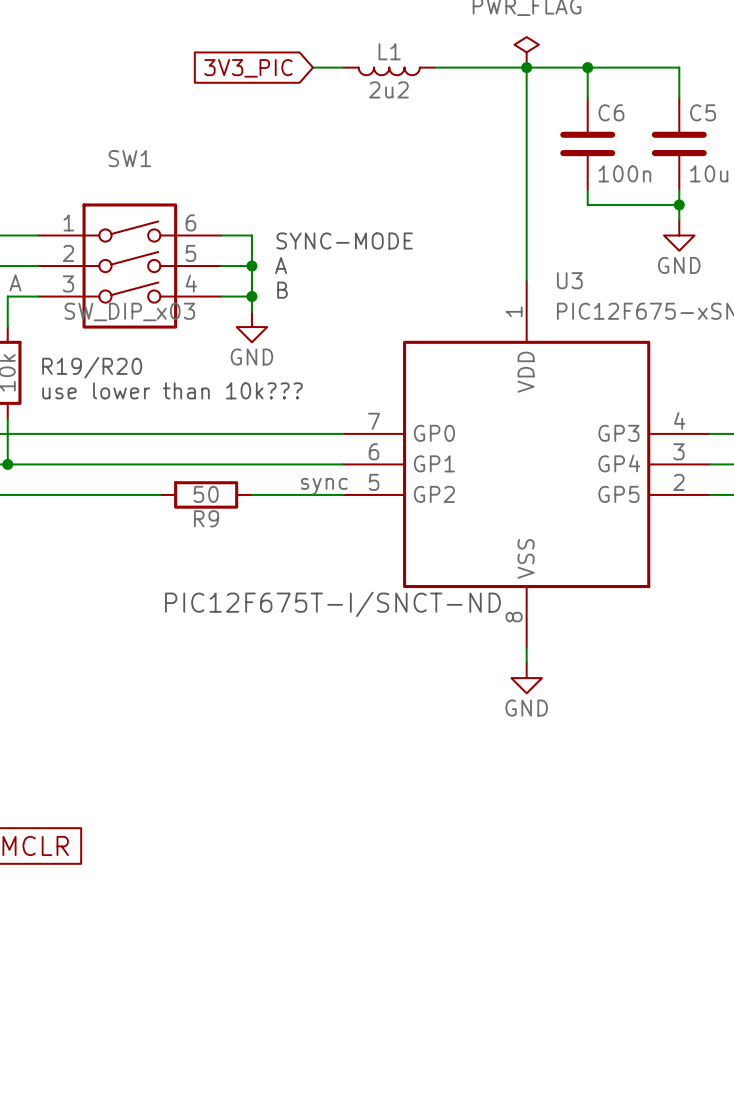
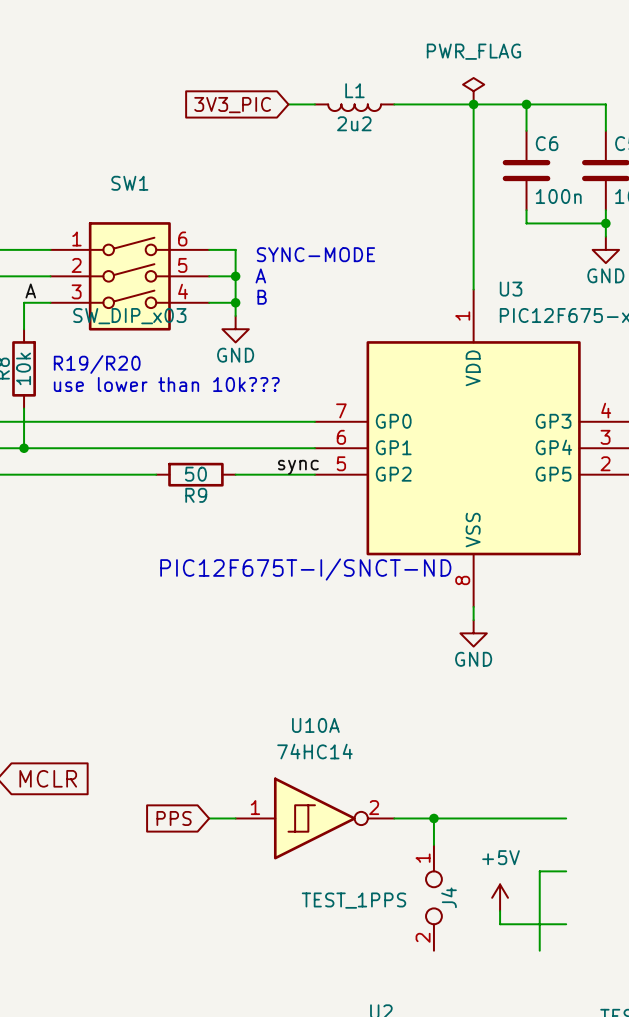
global label: none -> PPS (174, 818)
wire: none -> (209, 818) (235, 818)
U10A: none -> 74HC14 (314, 818)
wire: none -> (394, 818) (566, 818)
wire: none -> (433, 818) (433, 844)
junction: none -> (433, 818)
wire: none -> (566, 871) (539, 871) (539, 950)
J4: none -> TEST_1PPS (433, 897)
power symbol: none -> +5V (500, 897)
wire: none -> (500, 911) (500, 924) (566, 924)

